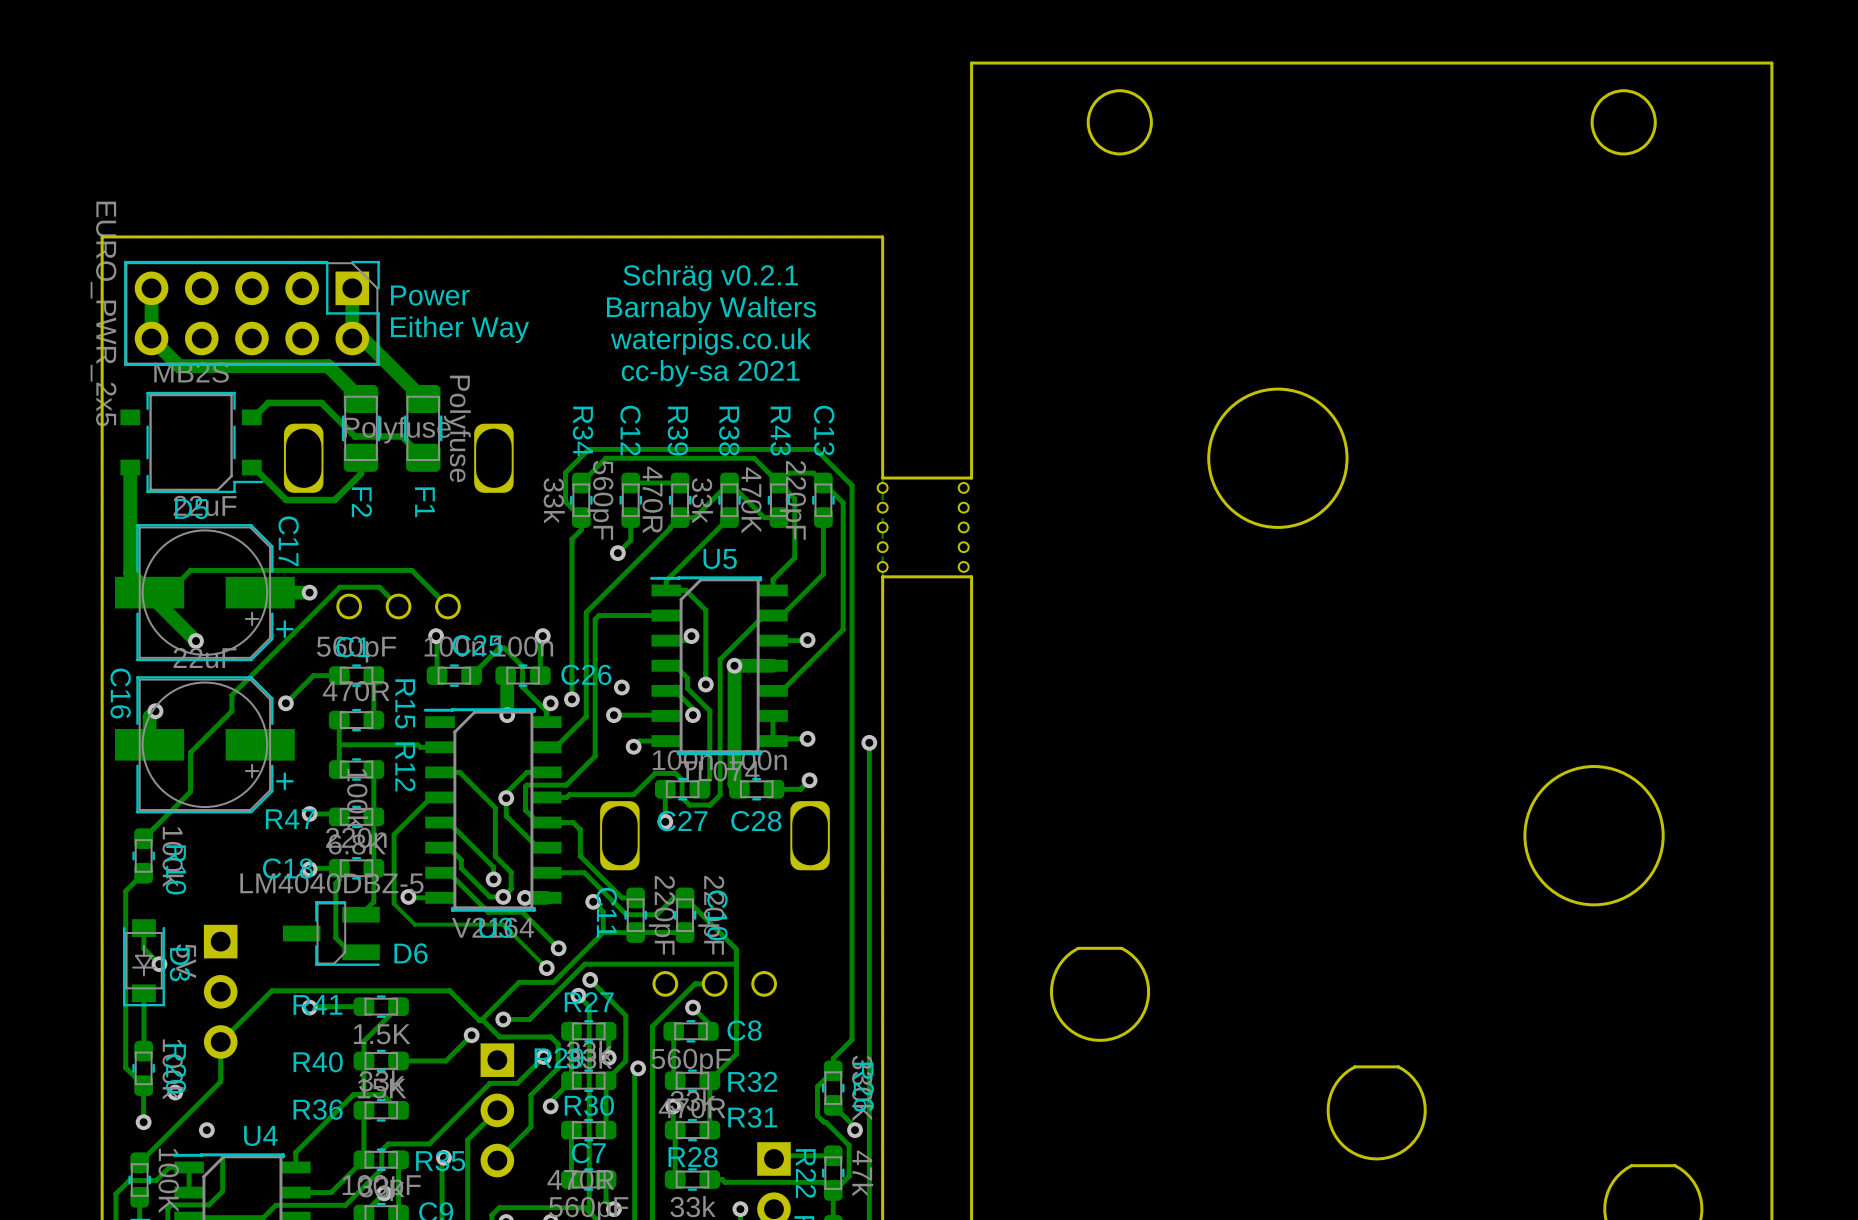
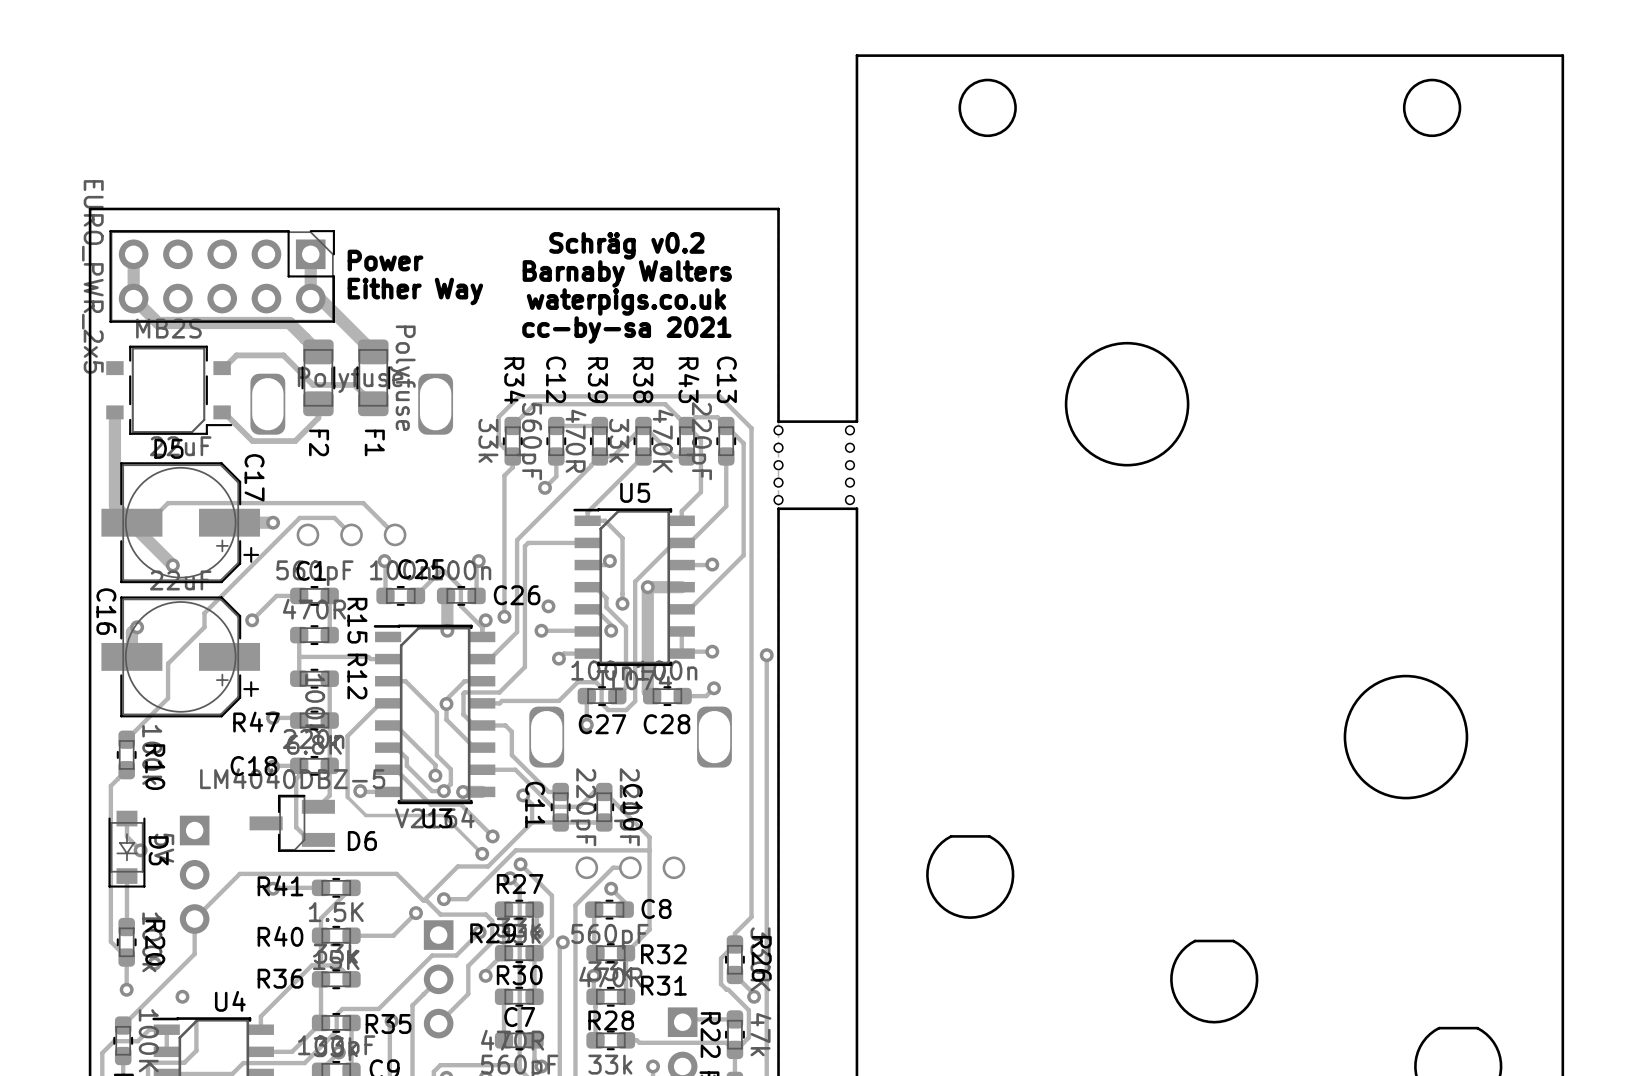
text: Schräg v0.2.1 (710, 277) -> Schräg v0.2 (626, 245)

